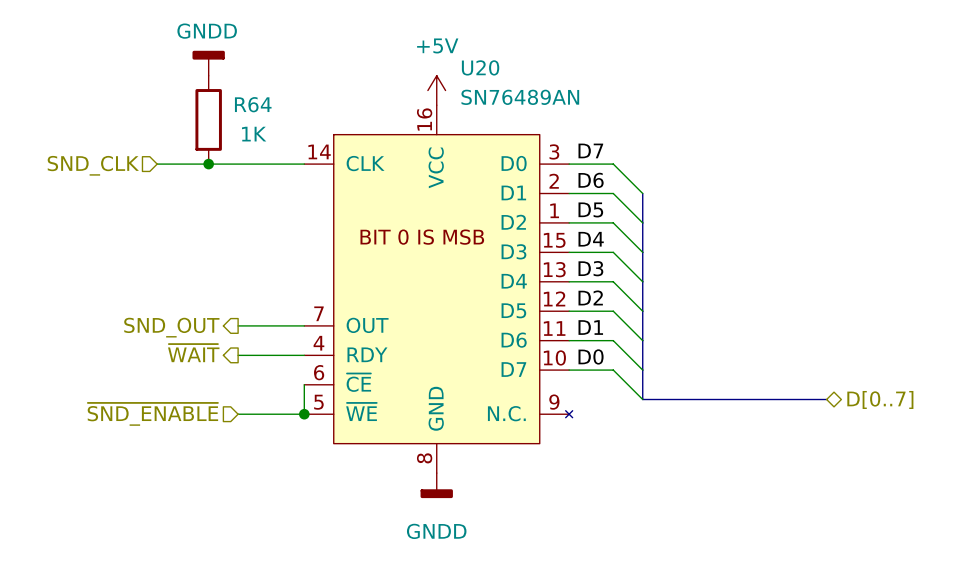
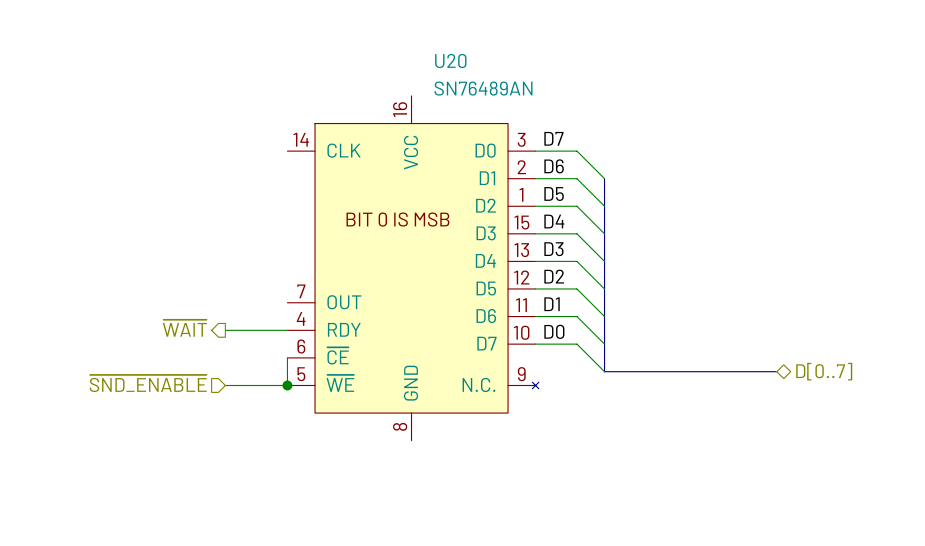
power symbol: GNDD (208, 63) -> none
power symbol: +5V (436, 90) -> none
R64: 1K (208, 119) -> none
wire: (157, 164) (304, 164) -> none
junction: (208, 164) -> none
hierarchical label: SND_CLK (93, 165) -> none
wire: (238, 325) (304, 325) -> none
hierarchical label: SND_OUT (171, 327) -> none
power symbol: GNDD (436, 485) -> none

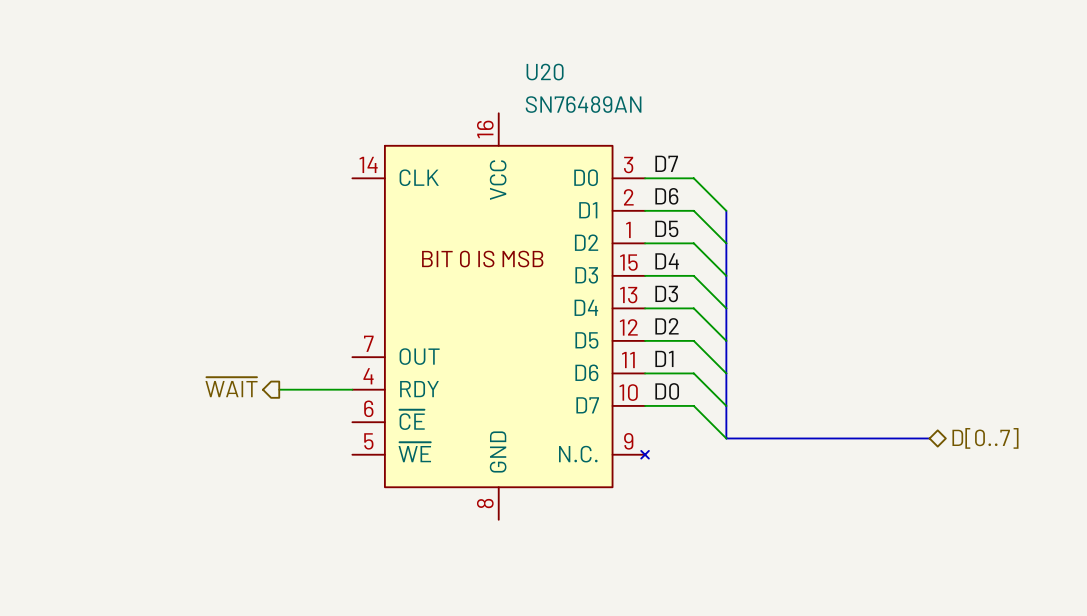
wire: (287, 357) (287, 385) (225, 385) -> none
hierarchical label: ~{SND_ENABLE} (148, 383) -> none
junction: (287, 385) -> none

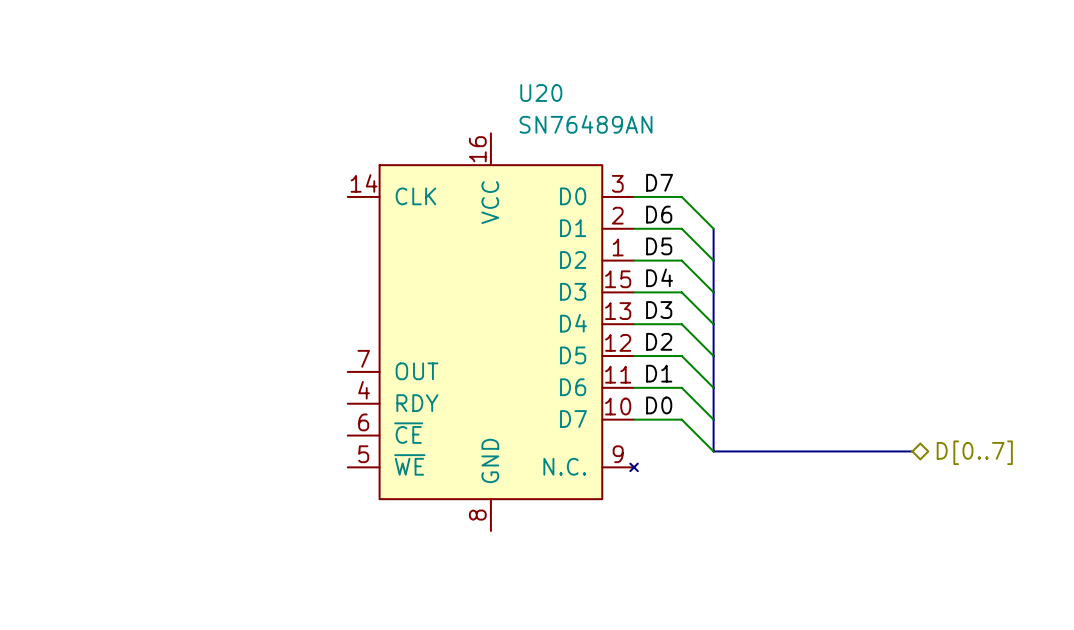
U20 text: BIT 0 IS MSB (482, 259) -> none
hierarchical label: ~{WAIT} (231, 387) -> none
wire: (279, 389) (352, 389) -> none

